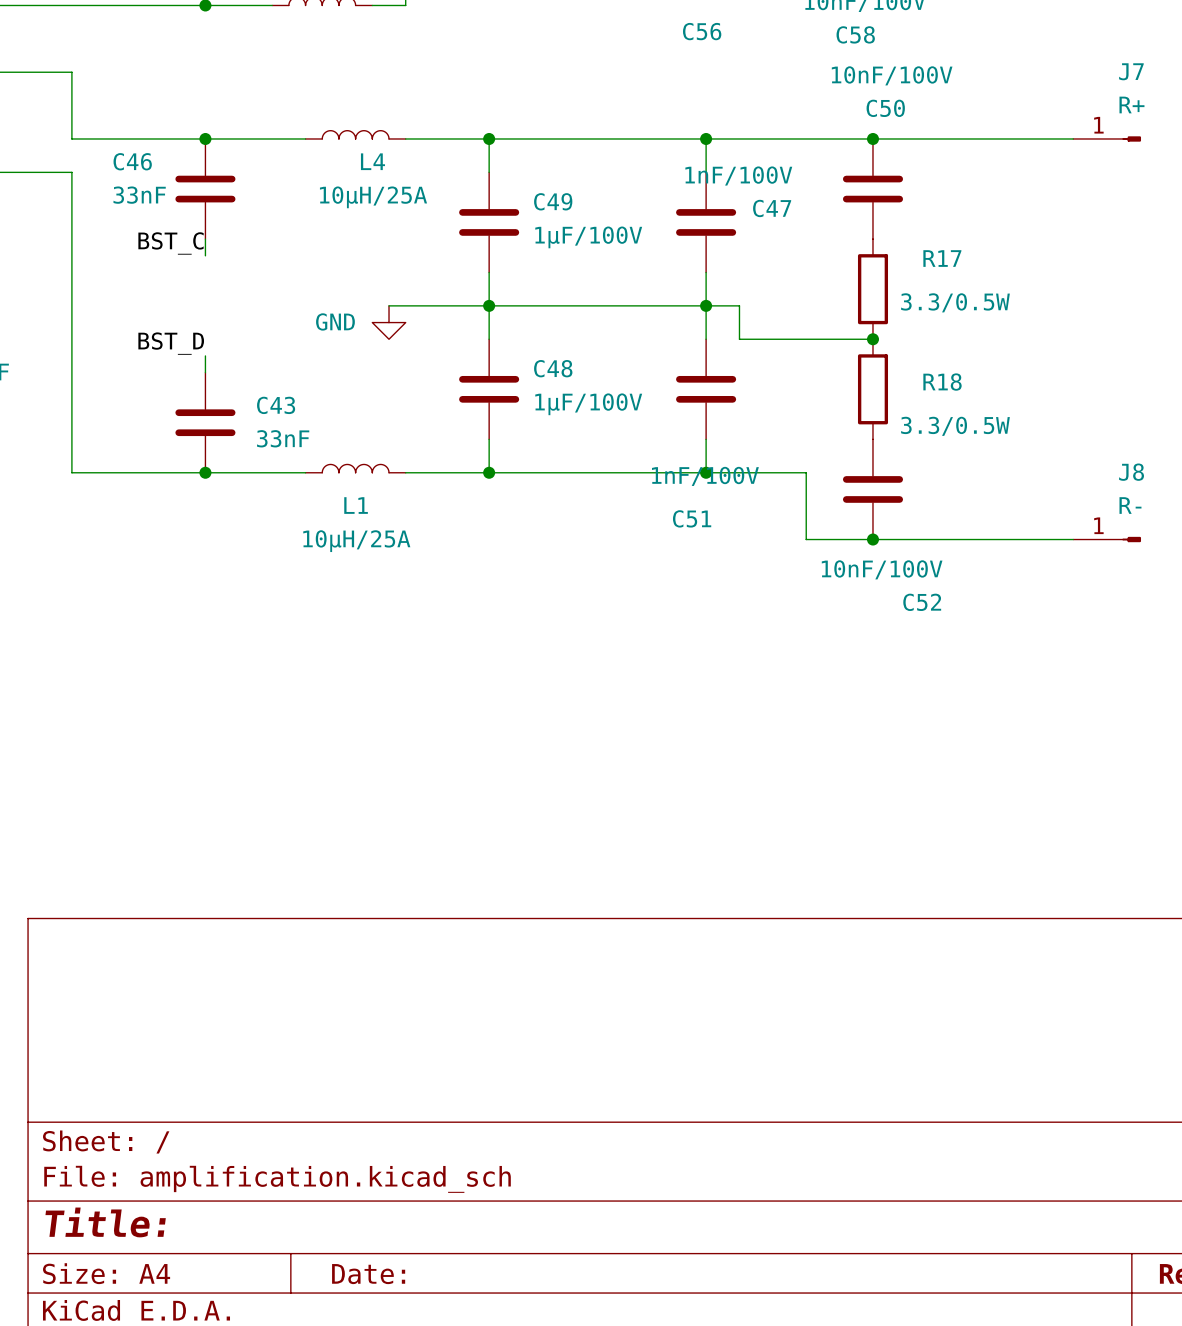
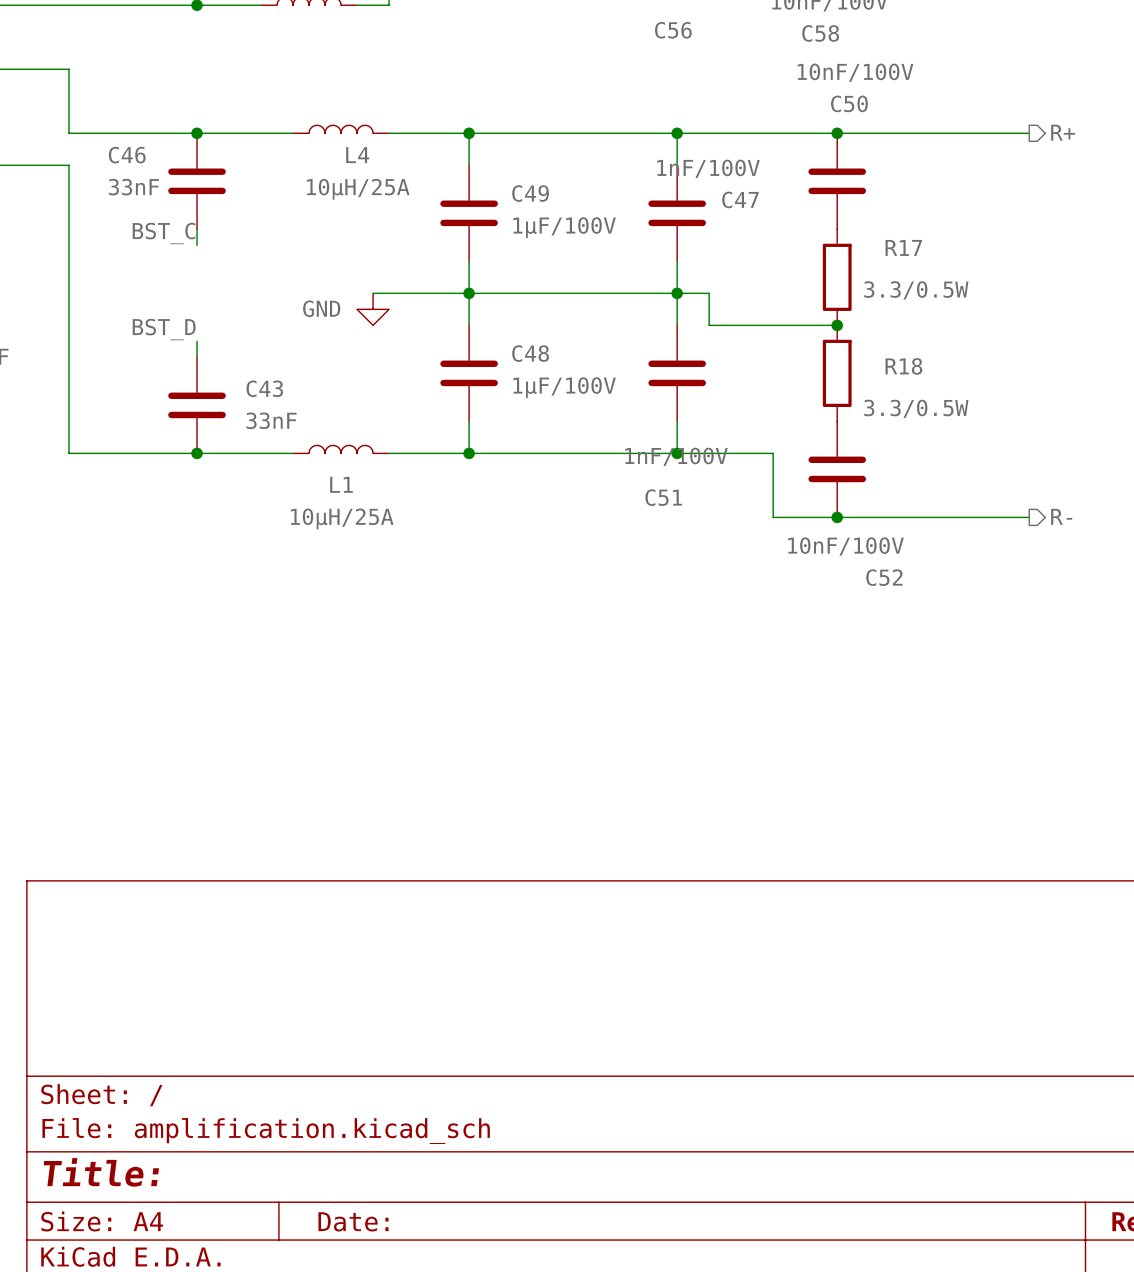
J7: R+ (1107, 138) -> none
hierarchical label: none -> R+ (1063, 132)
hierarchical label: none -> R- (1061, 516)
J8: R- (1107, 539) -> none

